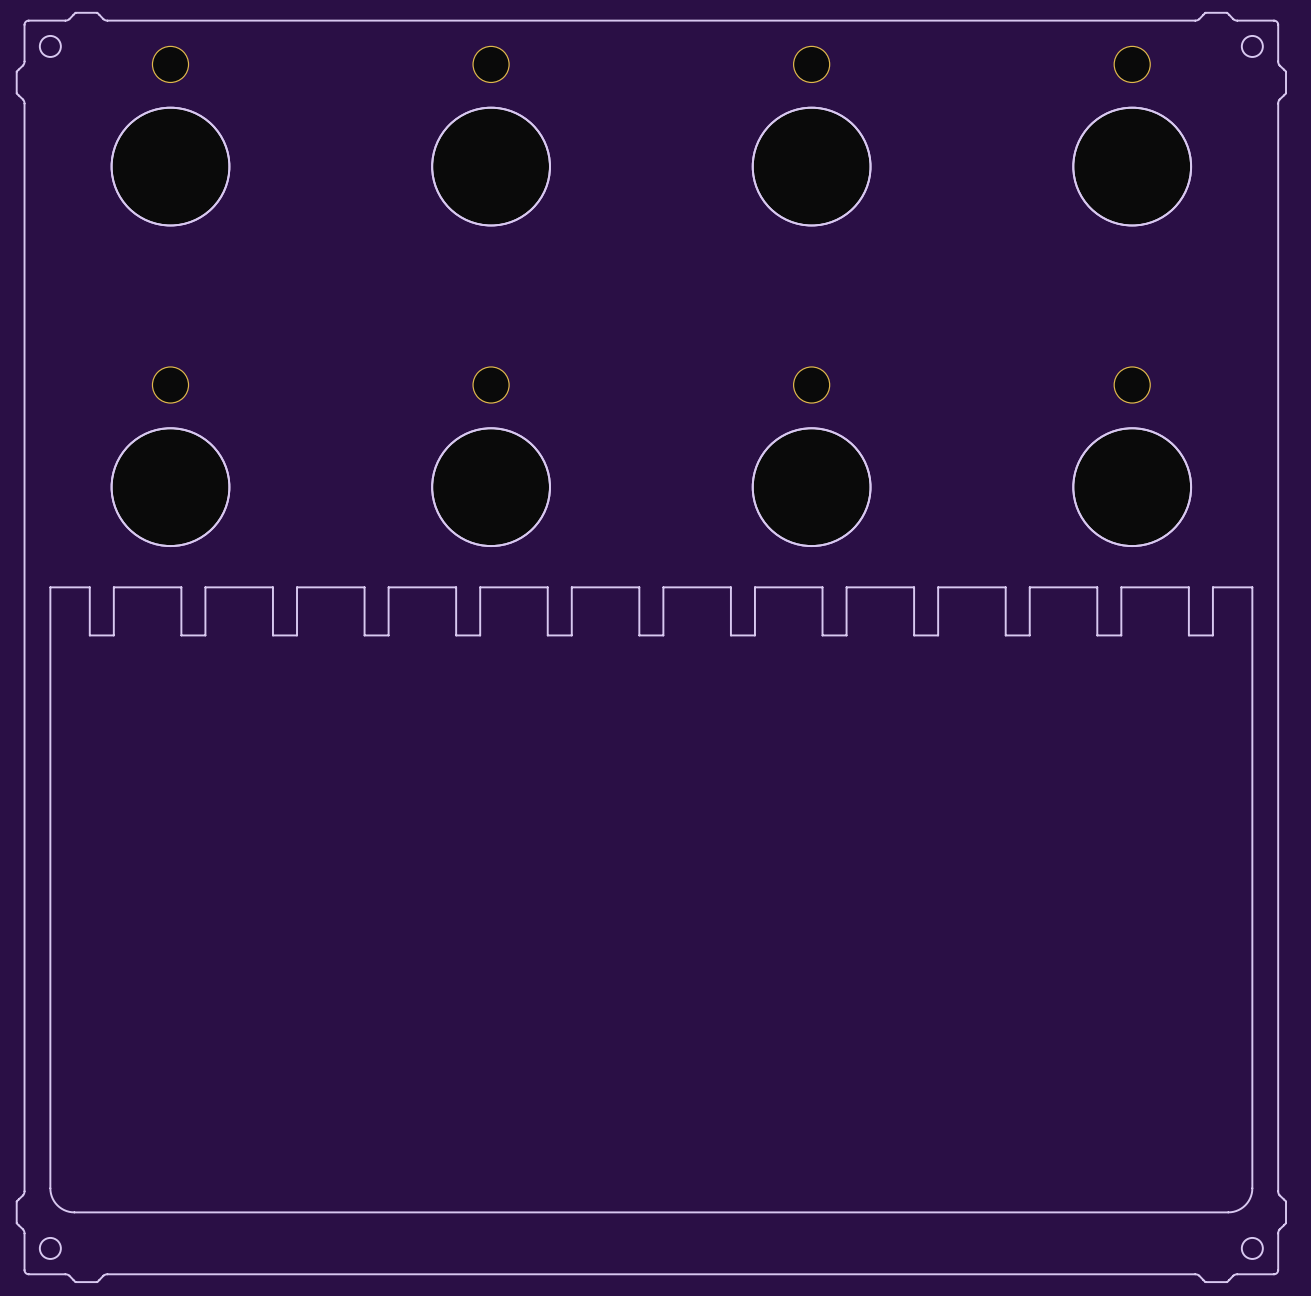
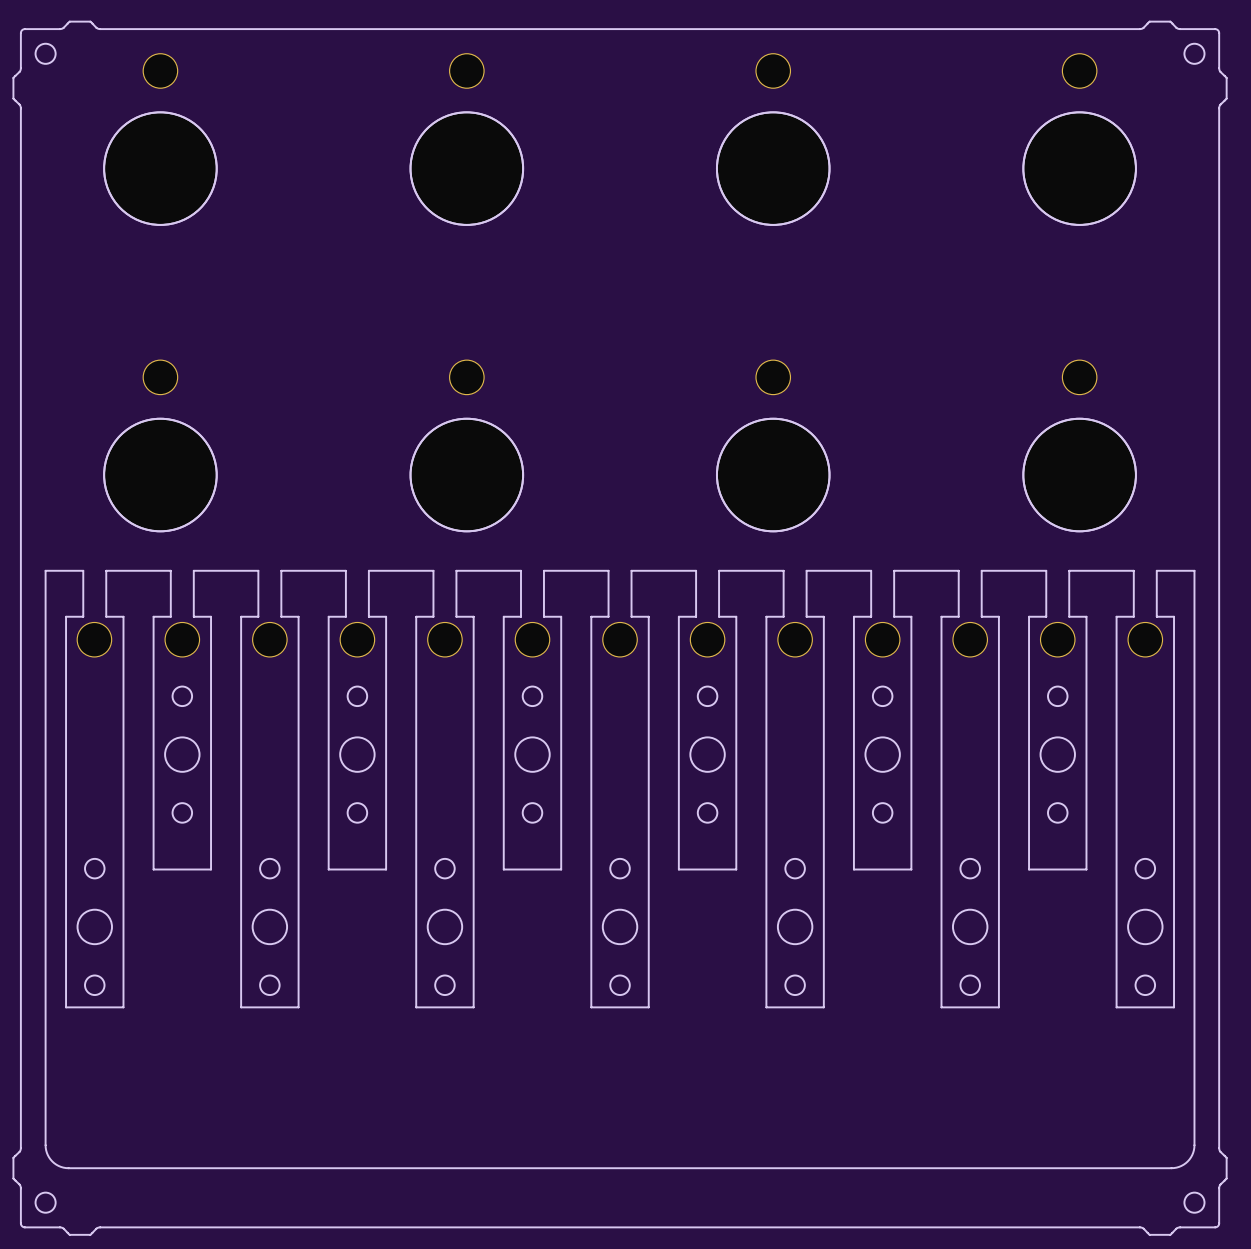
board edge: (89, 635) (113, 635) -> (83, 616) (66, 616) (66, 1007) (123, 1007) (123, 616) (106, 616)
board edge: (181, 635) (205, 635) -> (170, 616) (153, 616) (153, 869) (211, 869) (211, 616) (193, 616)
board edge: (272, 635) (297, 635) -> (258, 616) (241, 616) (241, 1007) (298, 1007) (298, 616) (281, 616)
board edge: (364, 635) (388, 635) -> (345, 616) (328, 616) (328, 869) (386, 869) (386, 616) (368, 616)
board edge: (456, 635) (480, 635) -> (433, 616) (416, 616) (416, 1007) (473, 1007) (473, 616) (456, 616)
board edge: (547, 635) (571, 635) -> (521, 616) (503, 616) (503, 869) (561, 869) (561, 616) (543, 616)
board edge: (639, 635) (663, 635) -> (608, 616) (591, 616) (591, 1007) (648, 1007) (648, 616) (631, 616)
board edge: (730, 635) (754, 635) -> (696, 616) (678, 616) (678, 869) (736, 869) (736, 616) (719, 616)
board edge: (822, 635) (846, 635) -> (783, 616) (766, 616) (766, 1007) (823, 1007) (823, 616) (806, 616)
board edge: (914, 635) (938, 635) -> (871, 616) (853, 616) (853, 869) (911, 869) (911, 616) (894, 616)
board edge: (1005, 635) (1029, 635) -> (958, 616) (941, 616) (941, 1007) (998, 1007) (998, 616) (981, 616)
board edge: (1097, 635) (1121, 635) -> (1046, 616) (1029, 616) (1029, 869) (1086, 869) (1086, 616) (1069, 616)
board edge: (1188, 635) (1212, 635) -> (1133, 616) (1116, 616) (1116, 1007) (1174, 1007) (1174, 616) (1156, 616)
part: none -> (94, 639)
part: none -> (182, 639)
part: none -> (269, 639)
part: none -> (357, 639)
part: none -> (444, 639)
part: none -> (532, 639)
part: none -> (620, 639)
part: none -> (707, 639)
part: none -> (795, 639)
part: none -> (882, 639)
part: none -> (970, 639)
part: none -> (1057, 639)
part: none -> (1145, 639)
round board edge: none -> [172, 686, 193, 707]
round board edge: none -> [347, 686, 368, 707]
round board edge: none -> [522, 686, 543, 707]
round board edge: none -> [697, 686, 718, 707]
round board edge: none -> [872, 686, 893, 707]
round board edge: none -> [1047, 686, 1068, 707]
round board edge: none -> [164, 737, 200, 773]
round board edge: none -> [339, 737, 375, 773]
round board edge: none -> [514, 737, 551, 773]
round board edge: none -> [690, 737, 726, 773]
round board edge: none -> [865, 737, 901, 773]
round board edge: none -> [1040, 737, 1076, 773]
round board edge: none -> [172, 802, 193, 823]
round board edge: none -> [347, 802, 368, 823]
round board edge: none -> [522, 802, 543, 823]
round board edge: none -> [697, 802, 718, 823]
round board edge: none -> [872, 802, 893, 823]
round board edge: none -> [1047, 802, 1068, 823]
round board edge: none -> [84, 858, 105, 879]
round board edge: none -> [259, 858, 280, 879]
round board edge: none -> [434, 858, 455, 879]
round board edge: none -> [609, 858, 631, 879]
round board edge: none -> [785, 858, 806, 879]
round board edge: none -> [960, 858, 981, 879]
round board edge: none -> [1135, 858, 1156, 879]
round board edge: none -> [77, 909, 113, 945]
round board edge: none -> [252, 909, 288, 945]
round board edge: none -> [427, 909, 463, 945]
round board edge: none -> [602, 909, 638, 945]
round board edge: none -> [777, 909, 813, 945]
round board edge: none -> [952, 909, 988, 945]
round board edge: none -> [1127, 909, 1163, 945]
round board edge: none -> [84, 975, 105, 996]
round board edge: none -> [259, 975, 280, 996]
round board edge: none -> [434, 975, 455, 996]
round board edge: none -> [609, 975, 631, 996]
round board edge: none -> [785, 975, 806, 996]
round board edge: none -> [960, 975, 981, 996]
round board edge: none -> [1135, 975, 1156, 996]

